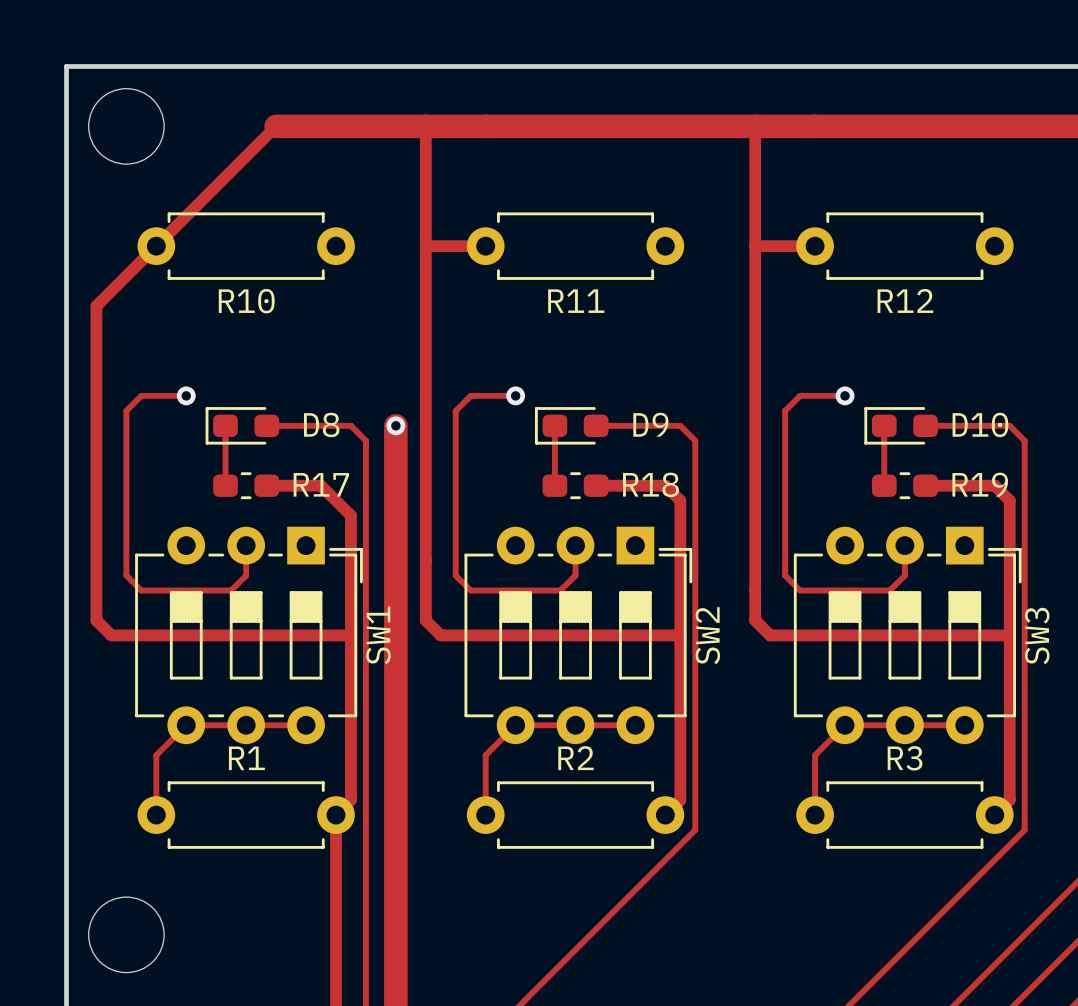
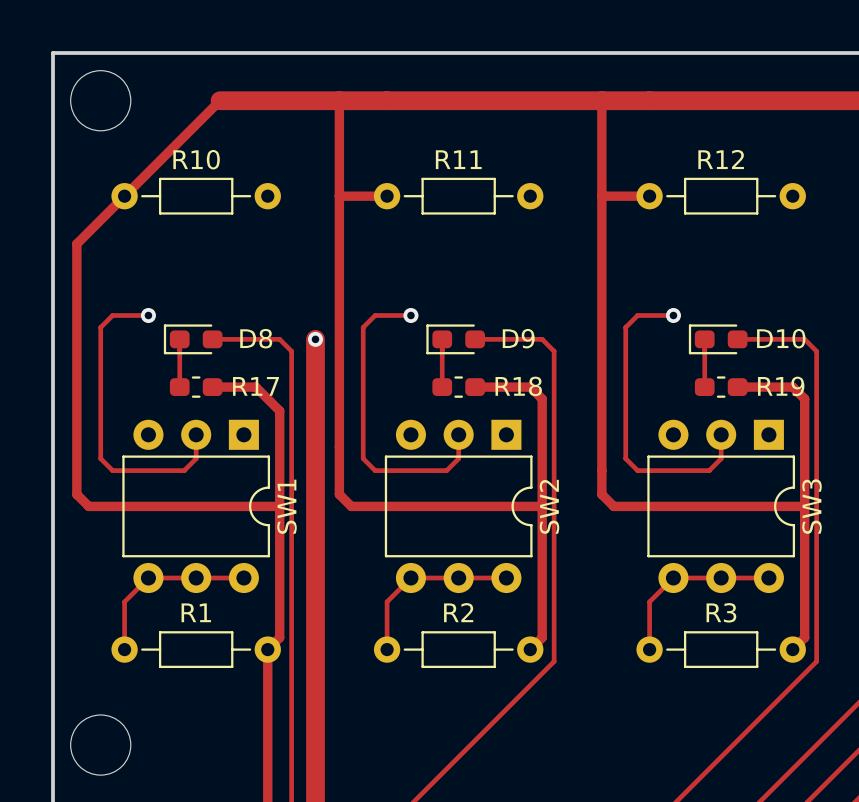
R10 footprint: [137, 212, 355, 280] -> [111, 177, 281, 215]
R11 footprint: [466, 212, 685, 280] -> [373, 177, 544, 215]
R12 footprint: [796, 212, 1014, 280] -> [636, 177, 806, 215]
R12 name position: R12 (905, 300) -> R12 (721, 159)
R10 name position: R10 (246, 301) -> R10 (196, 159)
R11 name position: R11 (576, 301) -> R11 (458, 159)
SW1 footprint: [135, 526, 363, 745] -> [122, 419, 271, 594]
SW2 footprint: [464, 526, 693, 745] -> [384, 419, 533, 594]
SW3 footprint: [793, 526, 1022, 745] -> [647, 419, 796, 594]
R1 footprint: [137, 781, 355, 849] -> [111, 631, 281, 669]
R2 footprint: [466, 781, 685, 849] -> [373, 631, 544, 669]
R3 footprint: [796, 781, 1014, 849] -> [636, 631, 806, 669]

